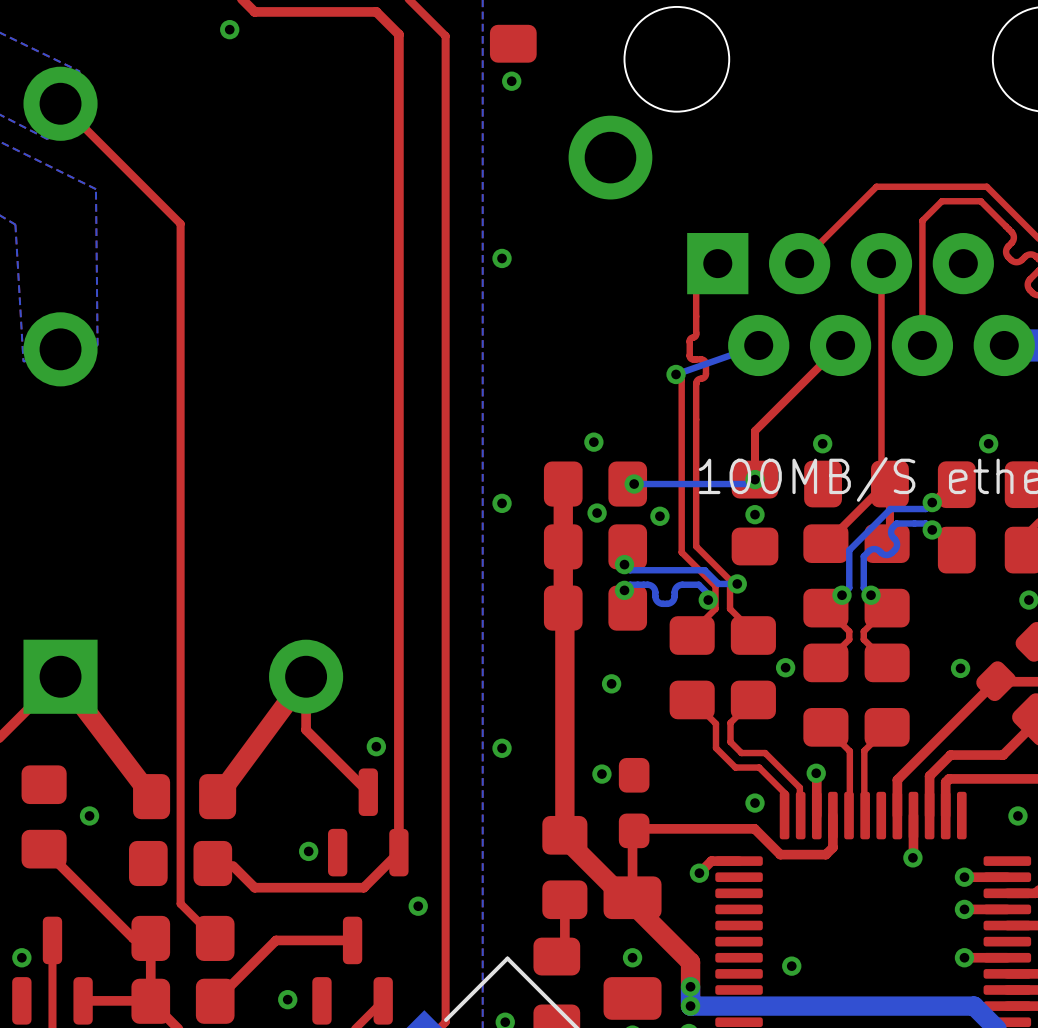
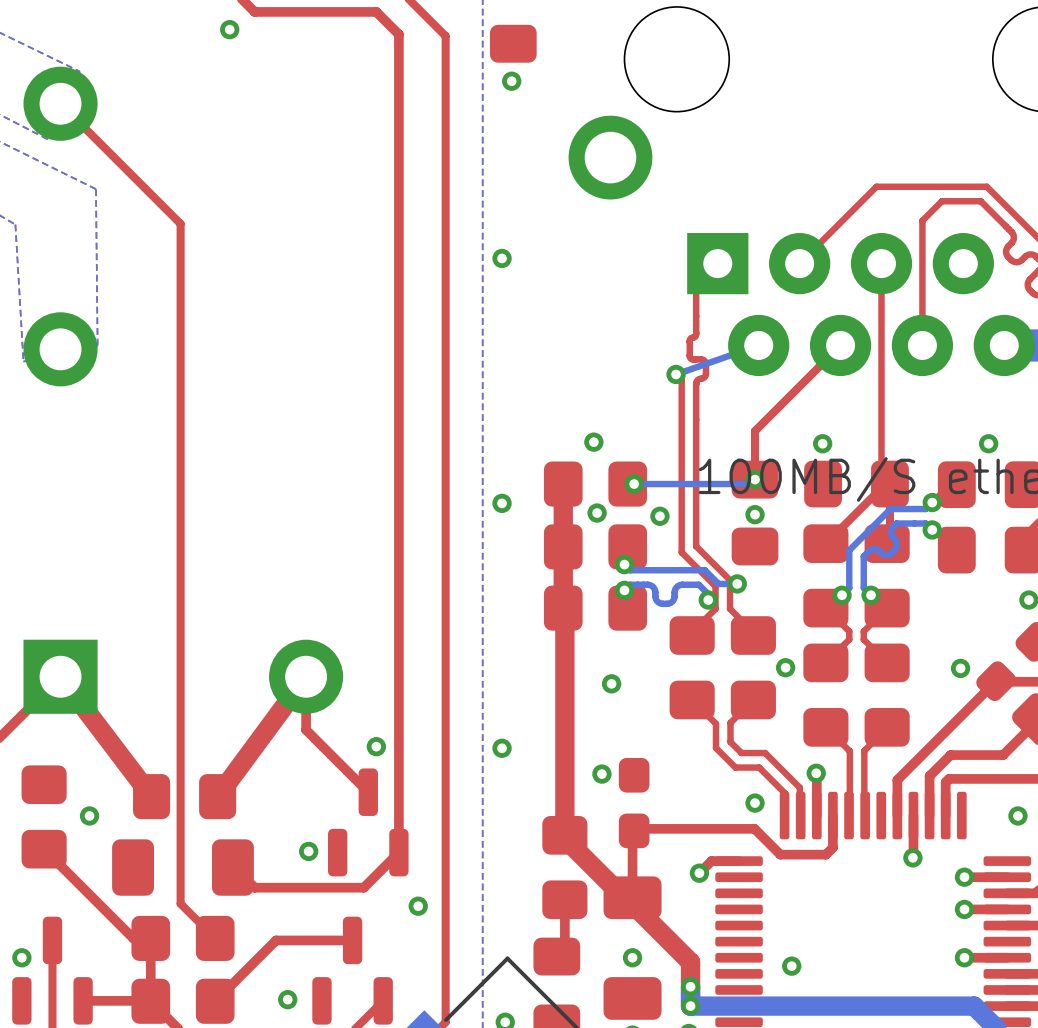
part footprint: [129, 840, 233, 887] -> [112, 839, 254, 896]

